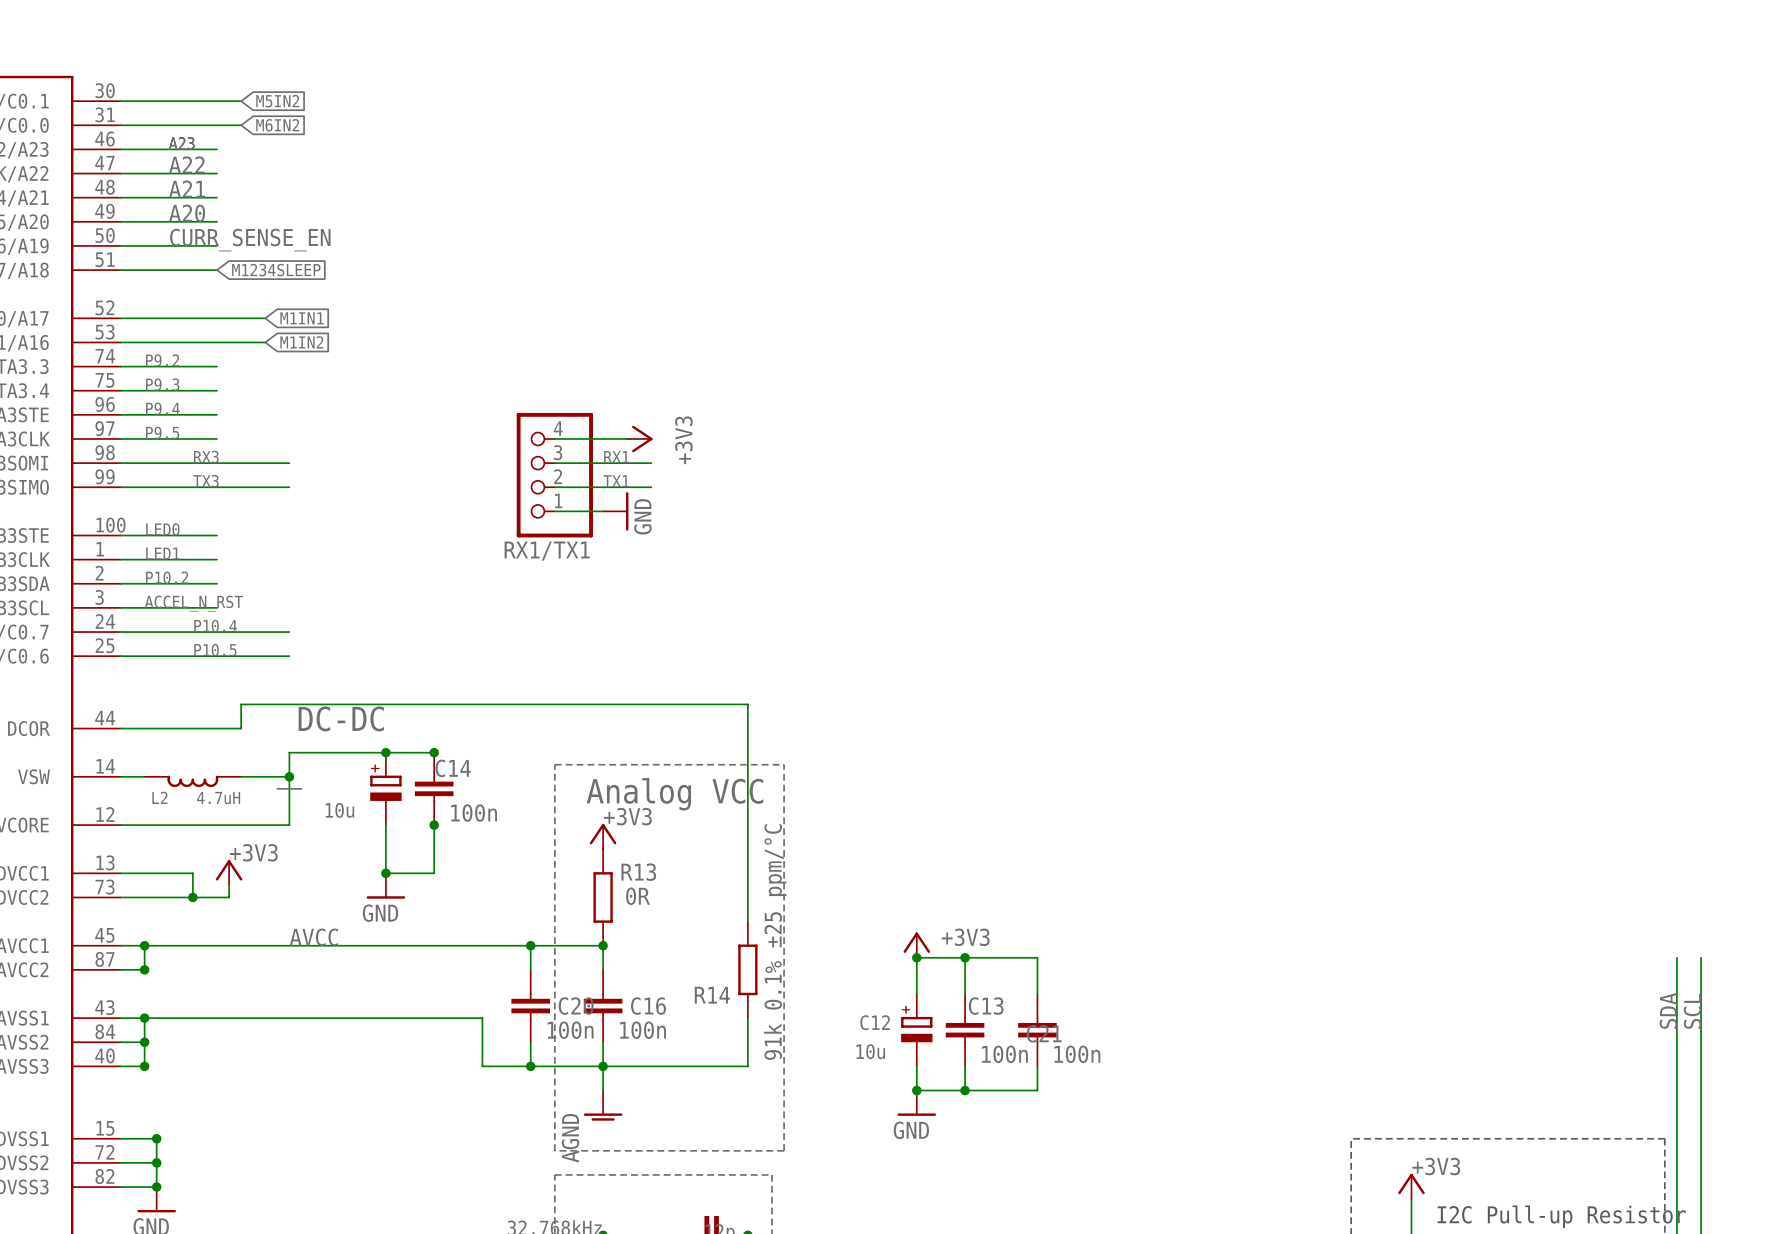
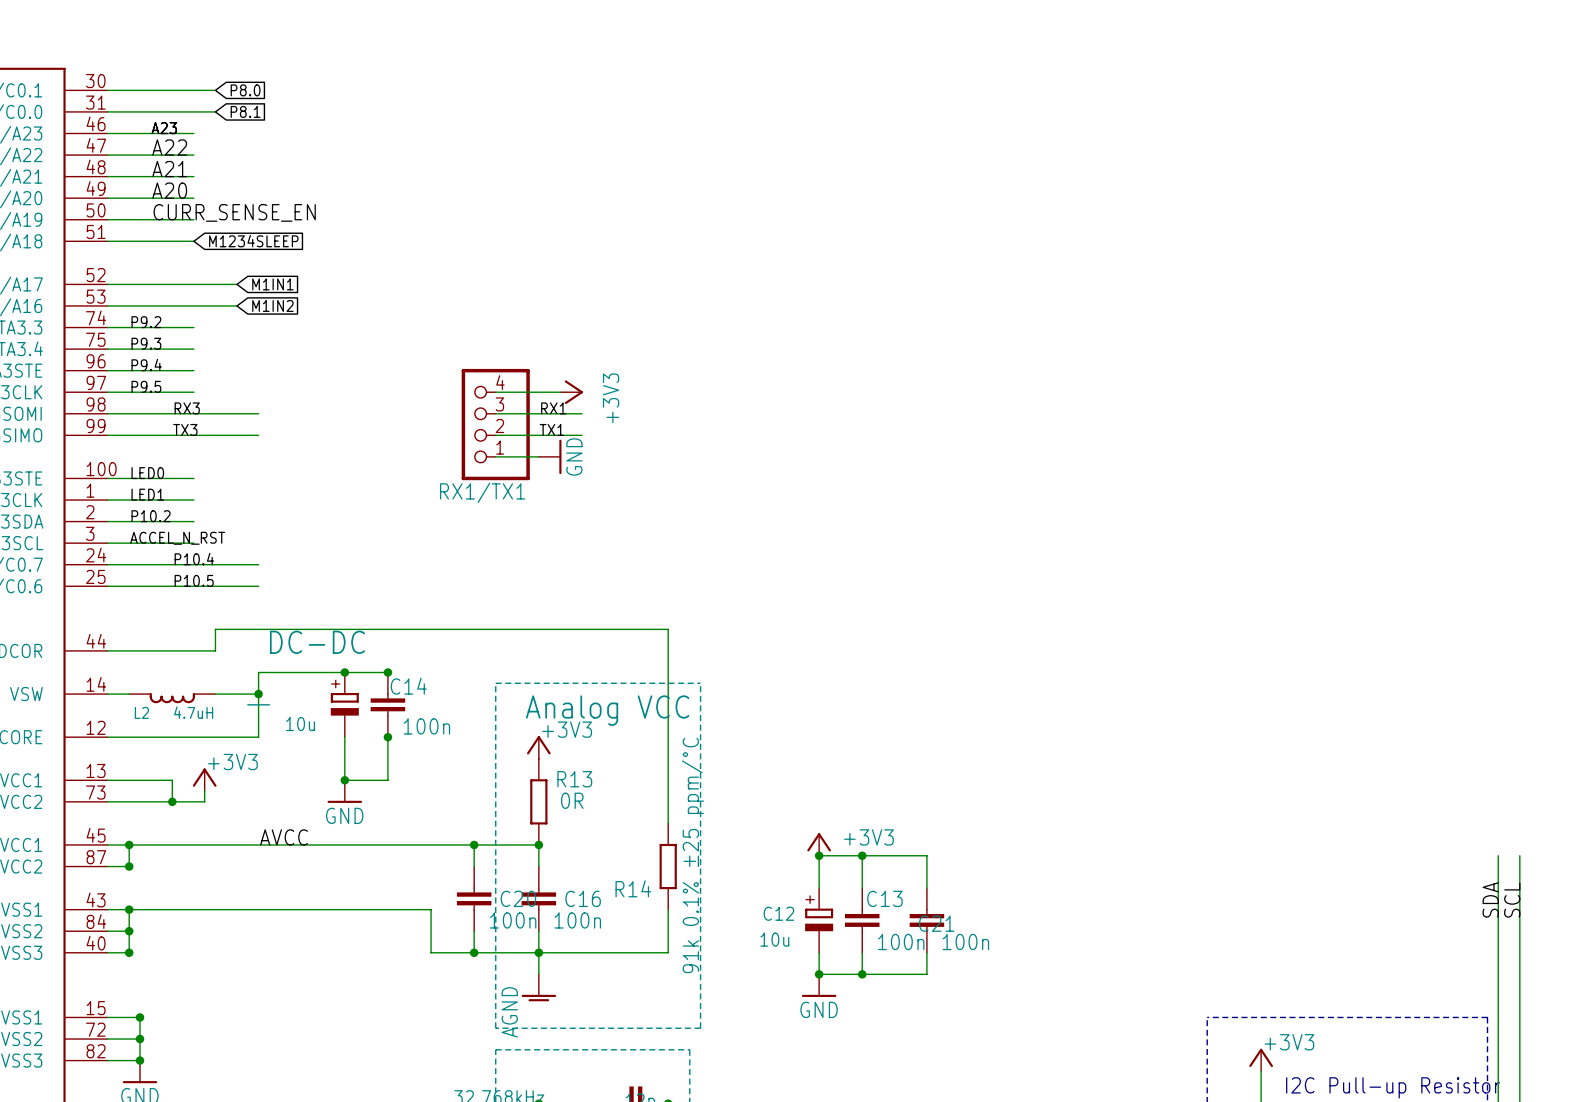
global label: M5IN2 (277, 101) -> P8.0 (245, 90)
global label: M6IN2 (277, 125) -> P8.1 (245, 111)

